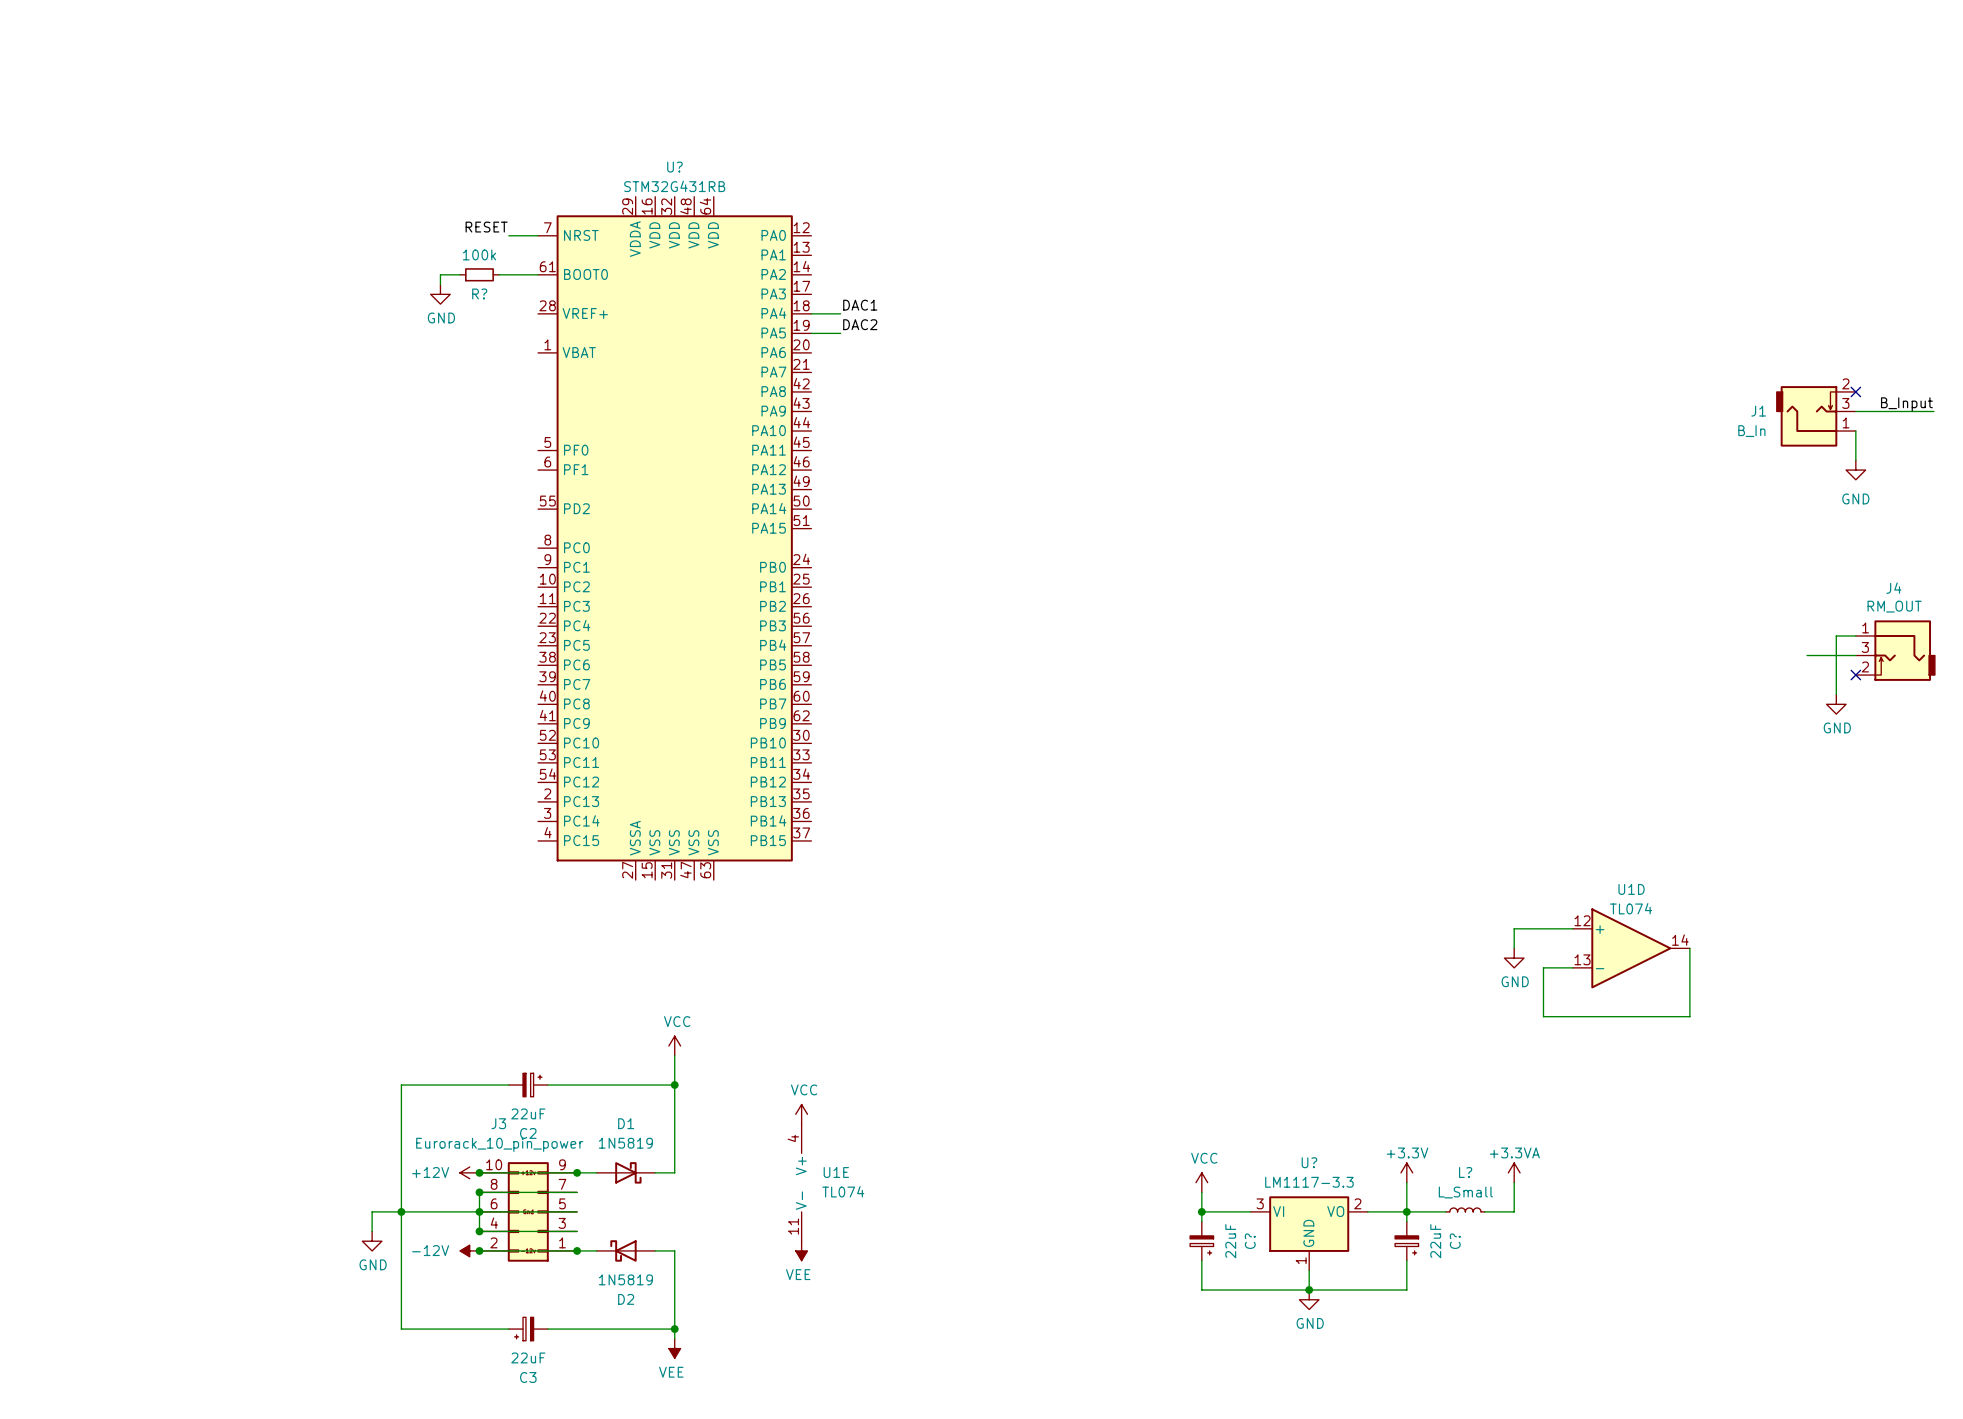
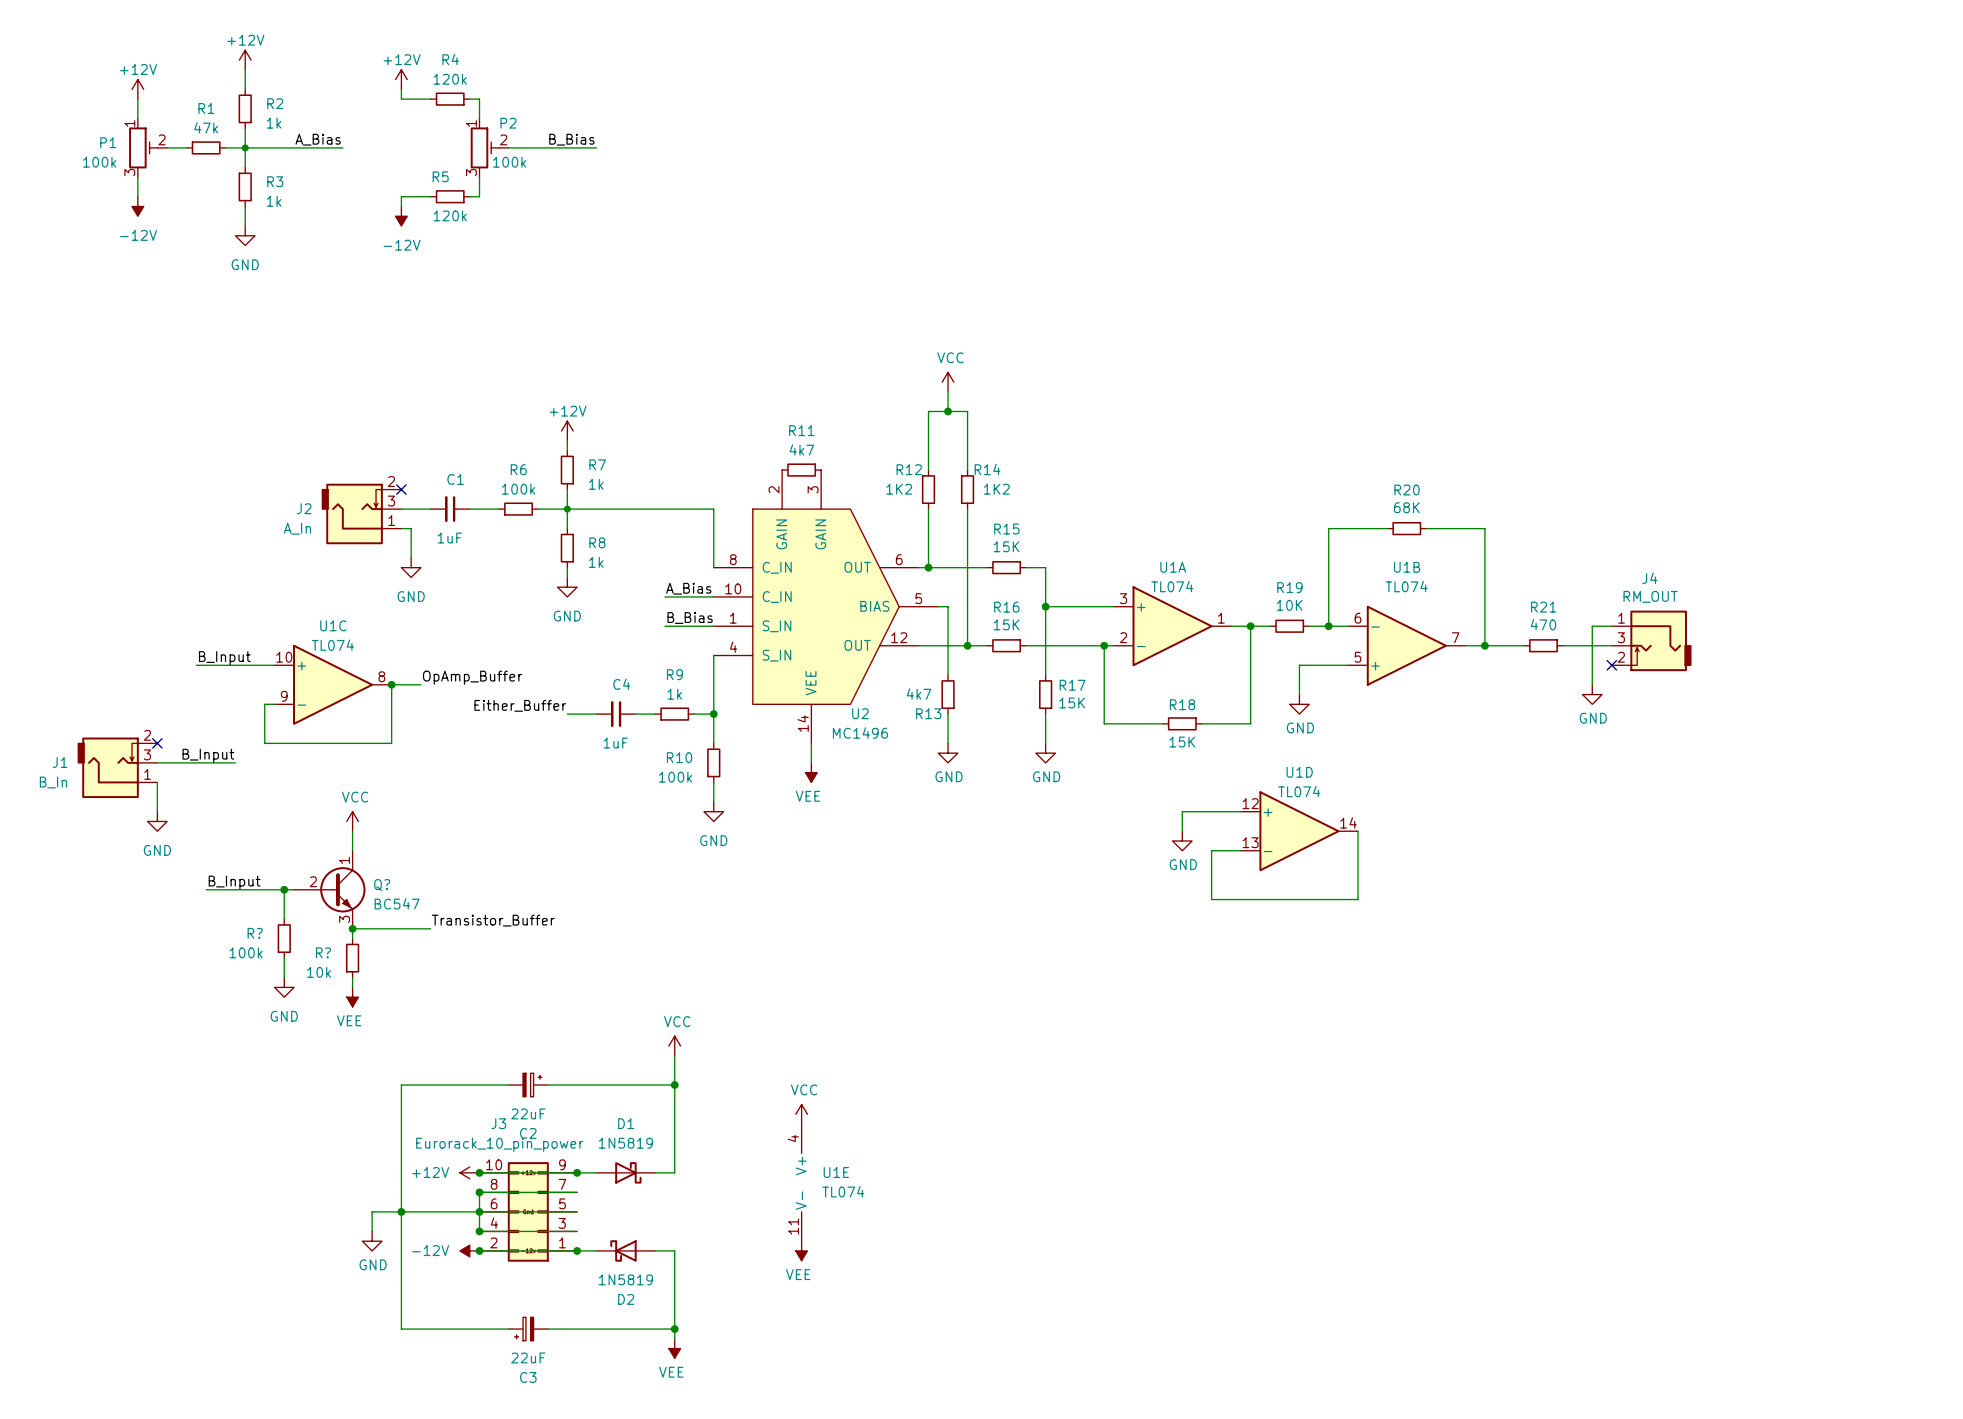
power symbol: none -> +12V (245, 60)
wire: none -> (245, 69) (245, 89)
power symbol: none -> +12V (401, 79)
power symbol: none -> +12V (137, 89)
wire: none -> (401, 89) (401, 99) (430, 99)
wire: none -> (137, 99) (137, 118)
R4: none -> 120k (450, 99)
wire: none -> (469, 99) (479, 99) (479, 118)
R2: none -> 1k (245, 108)
wire: none -> (245, 128) (245, 167)
label: none -> A_Bias (318, 139)
label: none -> B_Bias (571, 139)
P1: none -> 100k (148, 147)
wire: none -> (167, 147) (186, 147)
R1: none -> 47k (206, 147)
wire: none -> (225, 147) (342, 147)
junction: none -> (245, 147)
P2: none -> 100k (489, 147)
wire: none -> (508, 147) (596, 147)
wire: none -> (137, 177) (137, 196)
wire: none -> (479, 177) (479, 196) (469, 196)
R3: none -> 1k (245, 186)
wire: none -> (430, 196) (401, 196) (401, 206)
R5: none -> 120k (450, 196)
power symbol: none -> -12V (137, 206)
wire: none -> (245, 206) (245, 226)
power symbol: none -> -12V (401, 216)
label: RESET (486, 227) -> none
power symbol: none -> GND (245, 235)
wire: (508, 235) (538, 235) -> none
wire: (459, 274) (440, 274) (440, 284) -> none
R?: 100k (479, 274) -> none
wire: (499, 274) (538, 274) -> none
power symbol: GND (440, 294) -> none
label: DAC1 (860, 305) -> none
wire: (811, 313) (840, 313) -> none
label: DAC2 (860, 324) -> none
wire: (811, 333) (840, 333) -> none
power symbol: none -> VCC (948, 382)
wire: none -> (948, 391) (948, 411)
no-connect mark: (1855, 391) -> none
label: B_Input (1906, 404) -> none
junction: none -> (948, 411)
wire: (1855, 411) (1933, 411) -> none
J1 position: (1816, 416) -> (117, 767)
power symbol: none -> +12V (567, 431)
wire: (1855, 431) (1855, 460) -> none
R7: none -> 1k (567, 470)
R11: none -> 4k7 (801, 470)
wire: none -> (928, 470) (928, 411) (967, 411) (967, 470)
power symbol: GND (1855, 470) -> none
no-connect mark: none -> (401, 489)
R12: none -> 1K2 (928, 489)
R14: none -> 1K2 (967, 489)
wire: none -> (401, 509) (430, 509)
C1: none -> 1uF (450, 509)
wire: none -> (469, 509) (499, 509)
R6: none -> 100k (518, 509)
junction: none -> (567, 509)
wire: none -> (928, 509) (928, 567)
wire: none -> (967, 509) (967, 645)
J2: none -> A_In (361, 513)
wire: none -> (401, 528) (411, 528) (411, 557)
wire: none -> (1387, 528) (1328, 528) (1328, 626)
R20: none -> 68K (1406, 528)
wire: none -> (1426, 528) (1484, 528) (1484, 645)
U?: STM32G431RB (674, 538) -> none
R8: none -> 1k (567, 548)
power symbol: none -> GND (411, 567)
wire: none -> (918, 567) (987, 567)
junction: none -> (928, 567)
R15: none -> 15K (1006, 567)
wire: none -> (1026, 567) (1045, 567) (1045, 675)
power symbol: none -> GND (567, 587)
label: none -> A_Bias (688, 588)
U2: none -> MC1496 (826, 606)
wire: none -> (938, 606) (948, 606) (948, 675)
wire: none -> (1045, 606) (1113, 606)
junction: none -> (1045, 606)
label: none -> B_Bias (690, 617)
U1A: none -> TL074 (1172, 626)
wire: none -> (1231, 626) (1270, 626)
wire: none -> (1250, 626) (1250, 723) (1201, 723)
junction: none -> (1250, 626)
R19: none -> 10K (1289, 626)
wire: none -> (1309, 626) (1348, 626)
junction: none -> (1328, 626)
wire: none -> (1611, 626) (1592, 626) (1592, 684)
wire: (1855, 635) (1836, 635) (1836, 694) -> none
wire: none -> (918, 645) (987, 645)
junction: none -> (967, 645)
R16: none -> 15K (1006, 645)
wire: none -> (1026, 645) (1113, 645)
wire: none -> (1104, 645) (1104, 723) (1162, 723)
junction: none -> (1104, 645)
U1B: none -> TL074 (1406, 645)
wire: none -> (1465, 645) (1523, 645)
junction: none -> (1484, 645)
R21: none -> 470 (1543, 645)
wire: none -> (1563, 645) (1611, 645)
J4 position: (1895, 650) -> (1651, 640)
wire: (1807, 655) (1855, 655) -> none
label: none -> B_Input (224, 658)
wire: none -> (196, 665) (274, 665)
wire: none -> (1348, 665) (1299, 665) (1299, 694)
no-connect mark: none -> (1611, 665)
no-connect mark: (1855, 675) -> none
label: none -> OpAmp_Buffer (472, 677)
U1C: none -> TL074 (333, 684)
junction: none -> (391, 684)
wire: none -> (420, 684) (391, 684) (391, 743) (264, 743) (264, 704) (274, 704)
R13: none -> 4k7 (948, 694)
R17: none -> 15K (1045, 694)
power symbol: none -> GND (1592, 694)
power symbol: none -> GND (1299, 704)
power symbol: GND (1836, 704) -> none
label: none -> Either_Buffer (520, 705)
C4: none -> 1uF (616, 714)
R9: none -> 1k (674, 714)
junction: none -> (713, 714)
wire: none -> (948, 714) (948, 743)
wire: none -> (1045, 714) (1045, 743)
R18: none -> 15K (1182, 723)
no-connect mark: none -> (157, 743)
wire: none -> (811, 743) (811, 762)
power symbol: none -> GND (948, 753)
power symbol: none -> GND (1045, 753)
label: none -> B_Input (208, 755)
wire: none -> (157, 762) (235, 762)
R10: none -> 100k (713, 762)
power symbol: none -> VEE (811, 772)
wire: none -> (157, 782) (157, 811)
power symbol: none -> GND (713, 811)
wire: none -> (1240, 811) (1182, 811) (1182, 831)
power symbol: none -> GND (157, 821)
power symbol: none -> VCC (352, 821)
wire: none -> (352, 831) (352, 850)
wire: none -> (1358, 831) (1358, 899) (1211, 899) (1211, 850) (1240, 850)
power symbol: none -> GND (1182, 840)
label: none -> B_Input (234, 882)
wire: none -> (206, 889) (294, 889)
wire: none -> (284, 889) (284, 919)
junction: none -> (284, 889)
Q?: none -> BC547 (329, 889)
label: none -> Transistor_Buffer (493, 920)
junction: none -> (352, 928)
wire: none -> (430, 928) (352, 928) (352, 938)
wire: (1572, 928) (1514, 928) (1514, 948) -> none
R?: none -> 100k (284, 938)
U1D position: (1631, 948) -> (1299, 831)
wire: (1689, 948) (1689, 1016) (1543, 1016) (1543, 967) (1572, 967) -> none
wire: none -> (284, 958) (284, 977)
R?: none -> 10k (352, 958)
power symbol: GND (1514, 958) -> none
wire: none -> (352, 977) (352, 987)
power symbol: none -> GND (284, 987)
power symbol: none -> VEE (352, 997)
power symbol: +3.3V (1406, 1172) -> none
power symbol: +3.3VA (1514, 1172) -> none
power symbol: VCC (1201, 1182) -> none
wire: (1406, 1182) (1406, 1221) -> none
wire: (1514, 1182) (1514, 1211) (1484, 1211) -> none
wire: (1201, 1192) (1201, 1221) -> none
L?: L_Small (1465, 1209) -> none
wire: (1201, 1211) (1250, 1211) -> none
junction: (1201, 1211) -> none
wire: (1367, 1211) (1445, 1211) -> none
junction: (1406, 1211) -> none
U?: LM1117-3.3 (1309, 1233) -> none
C?: 22uF (1201, 1241) -> none
C?: 22uF (1406, 1241) -> none
wire: (1201, 1260) (1201, 1290) (1406, 1290) (1406, 1260) -> none
wire: (1309, 1270) (1309, 1290) -> none
junction: (1309, 1290) -> none
power symbol: GND (1309, 1299) -> none

